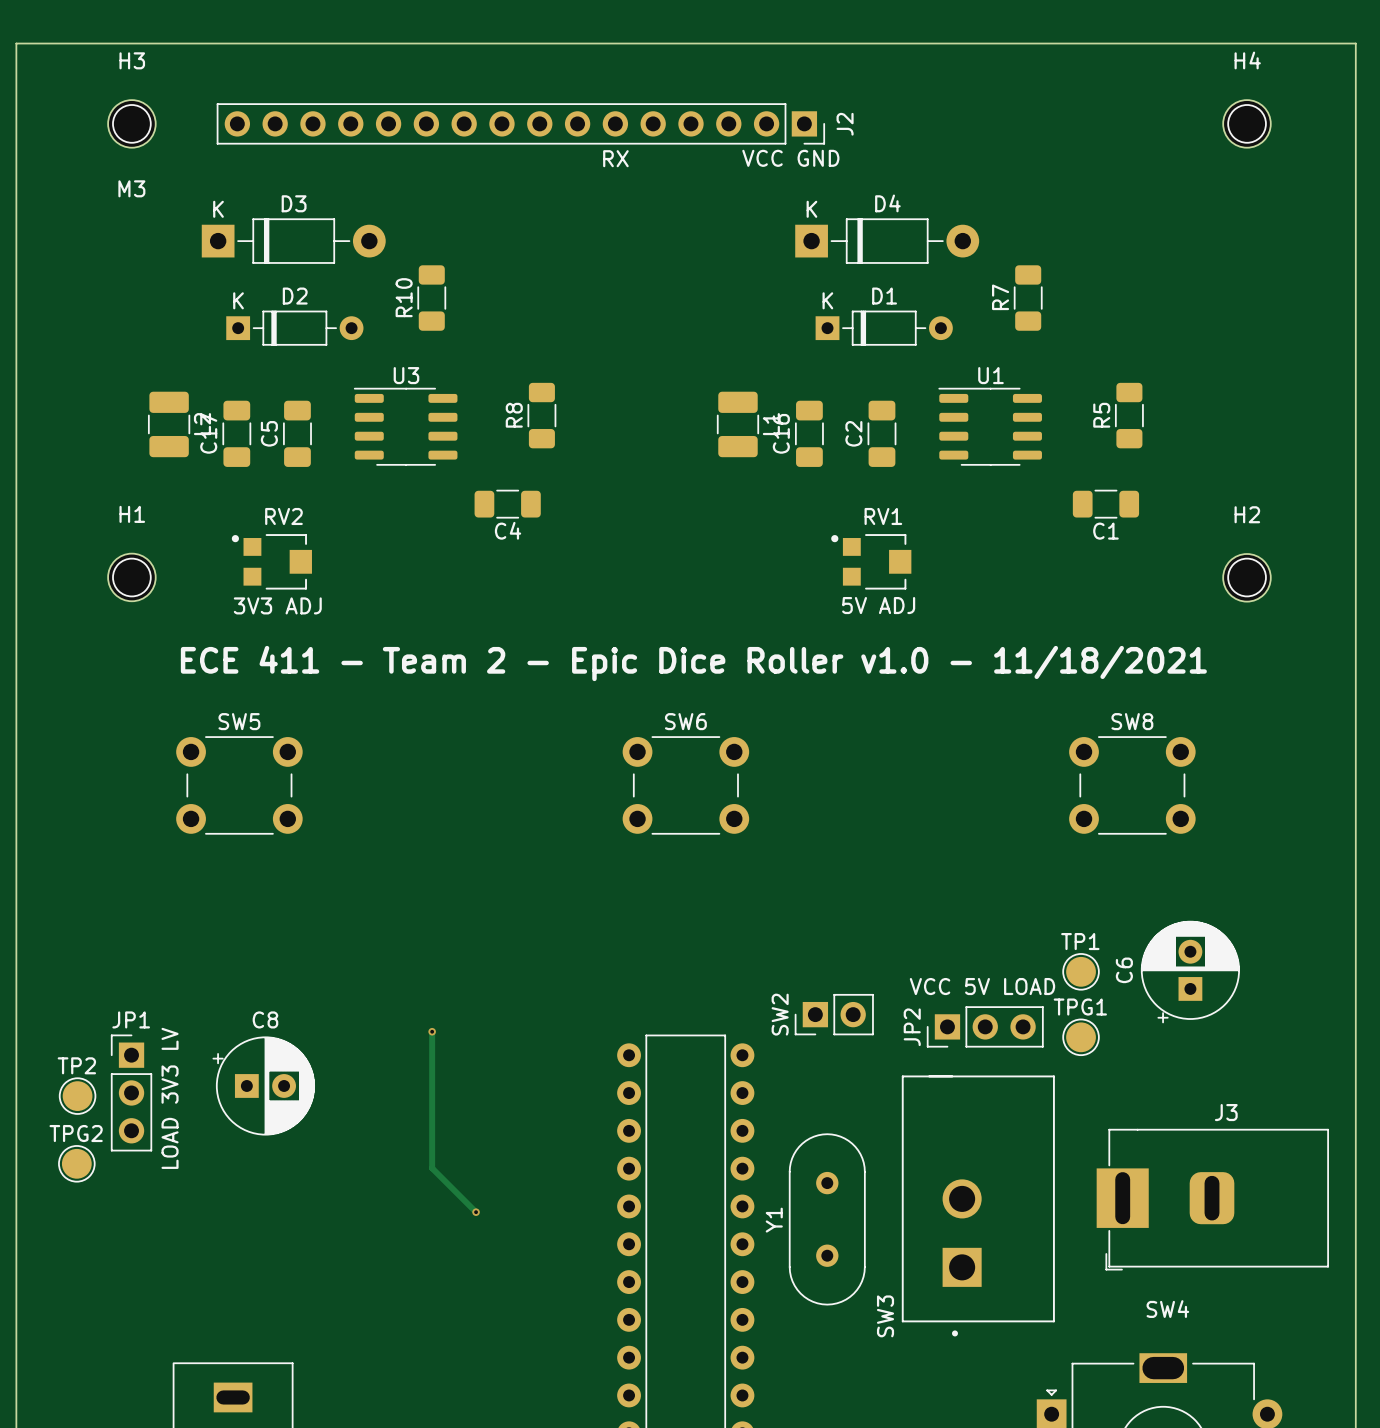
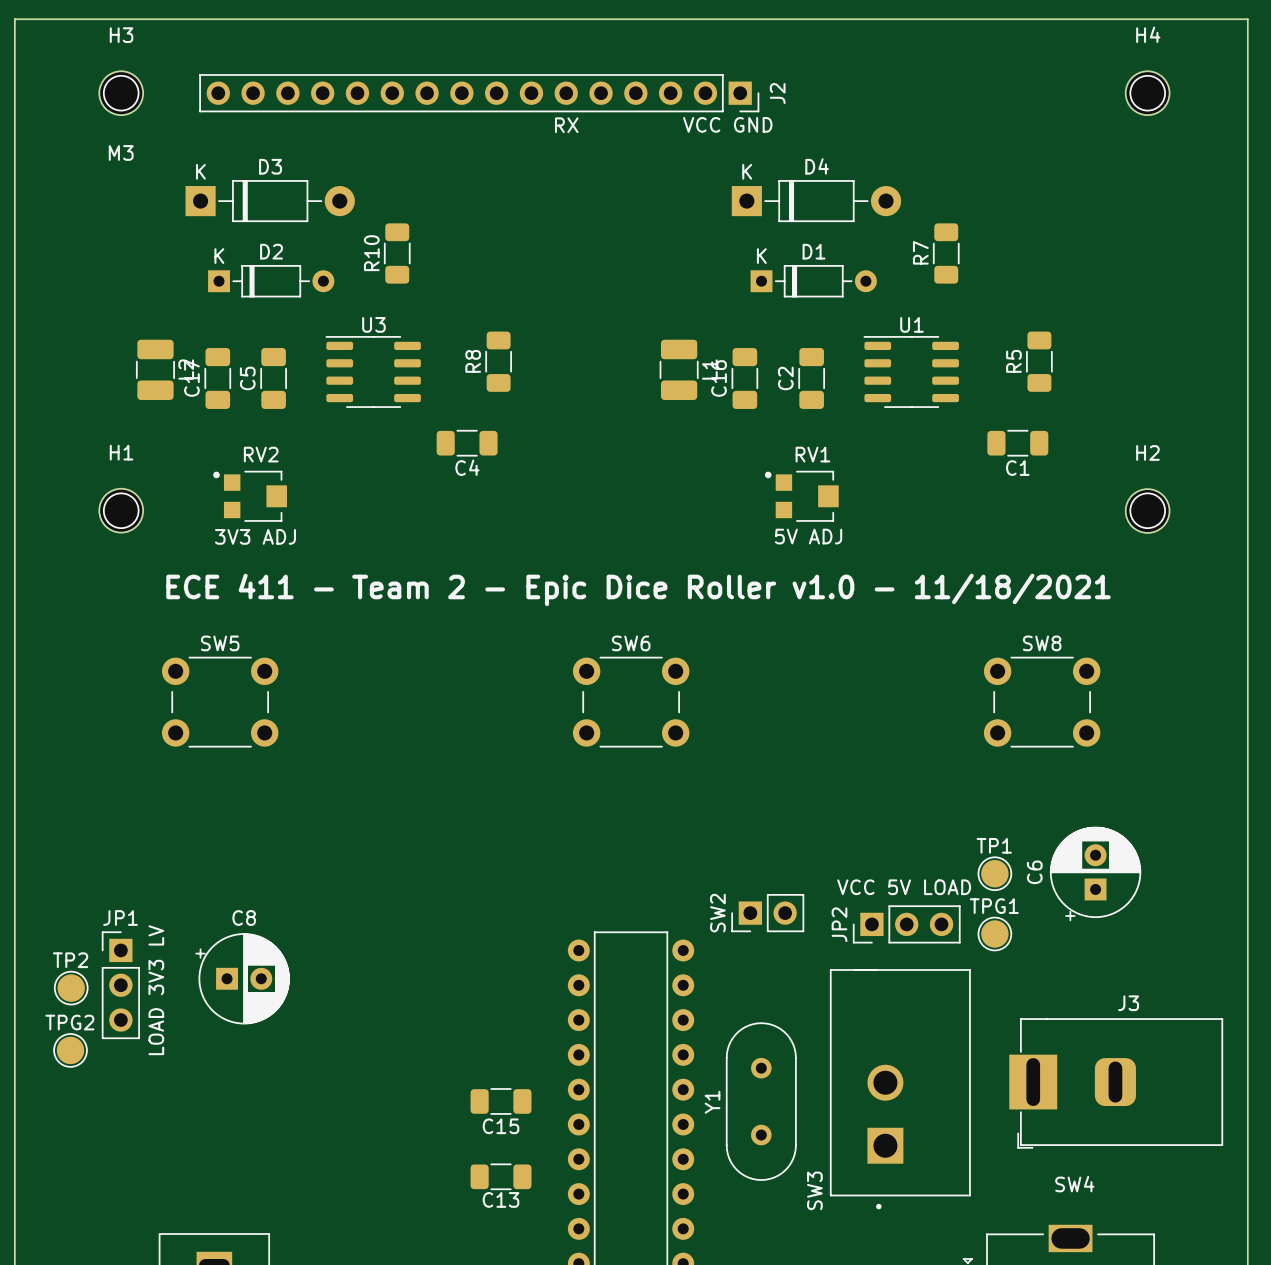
track: (432, 1031) (432, 1168) (476, 1212) -> none
via: (432, 1031) -> none
via: (476, 1212) -> none
C15: none -> (501, 1101)
C13: none -> (501, 1176)

